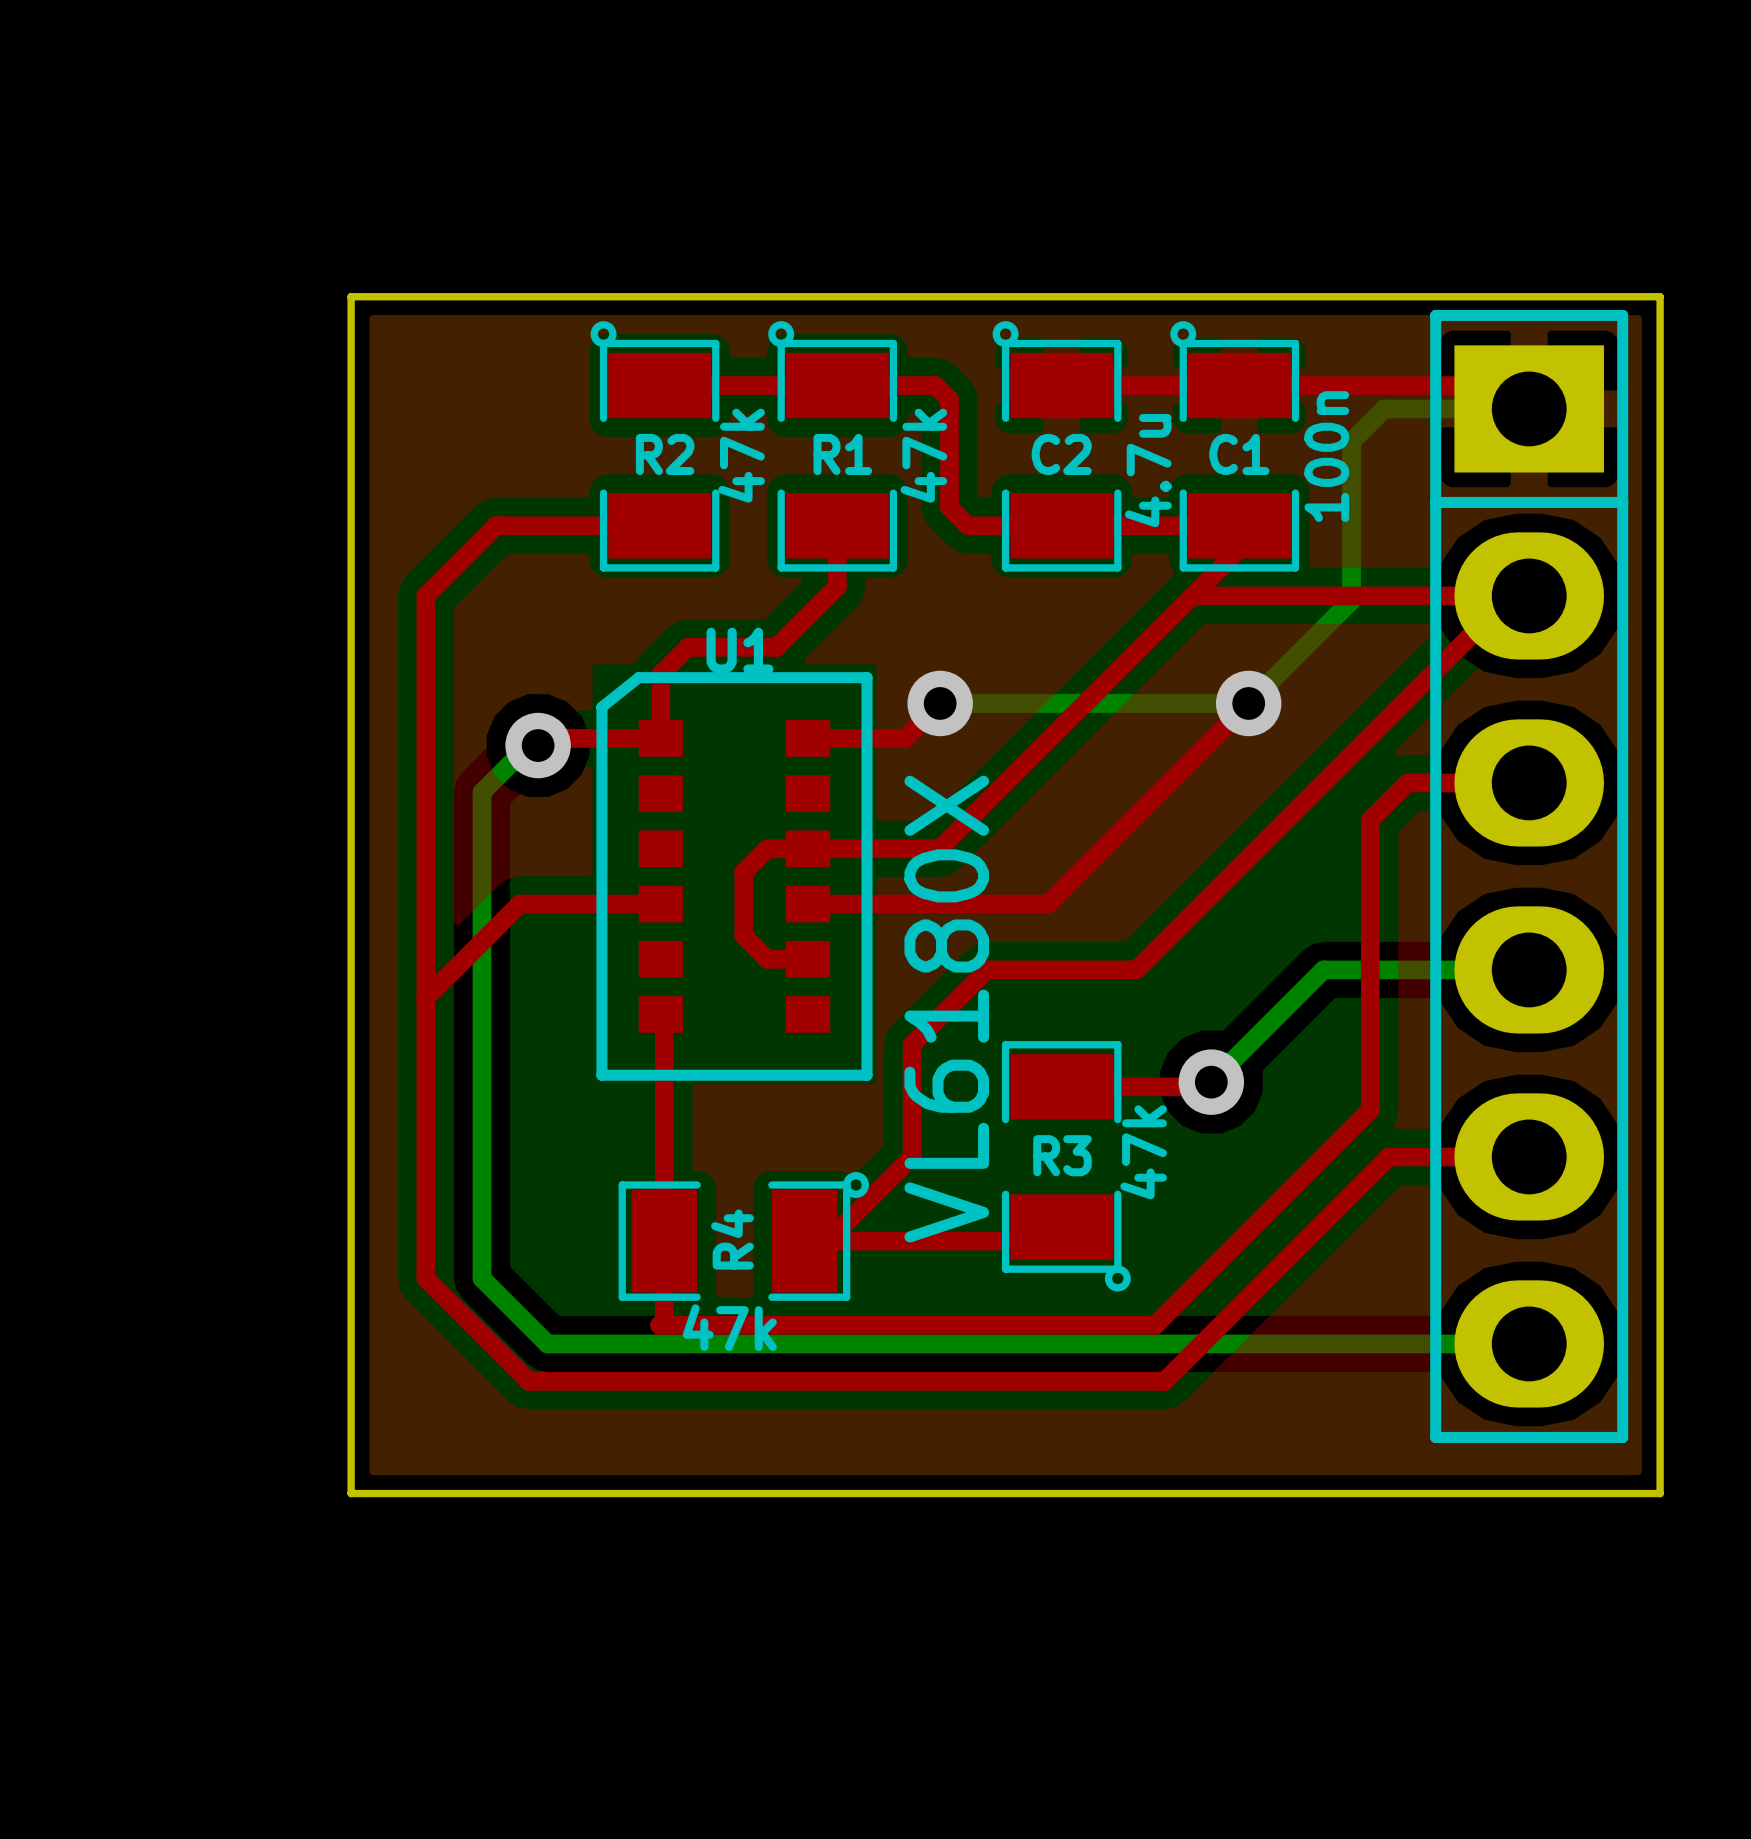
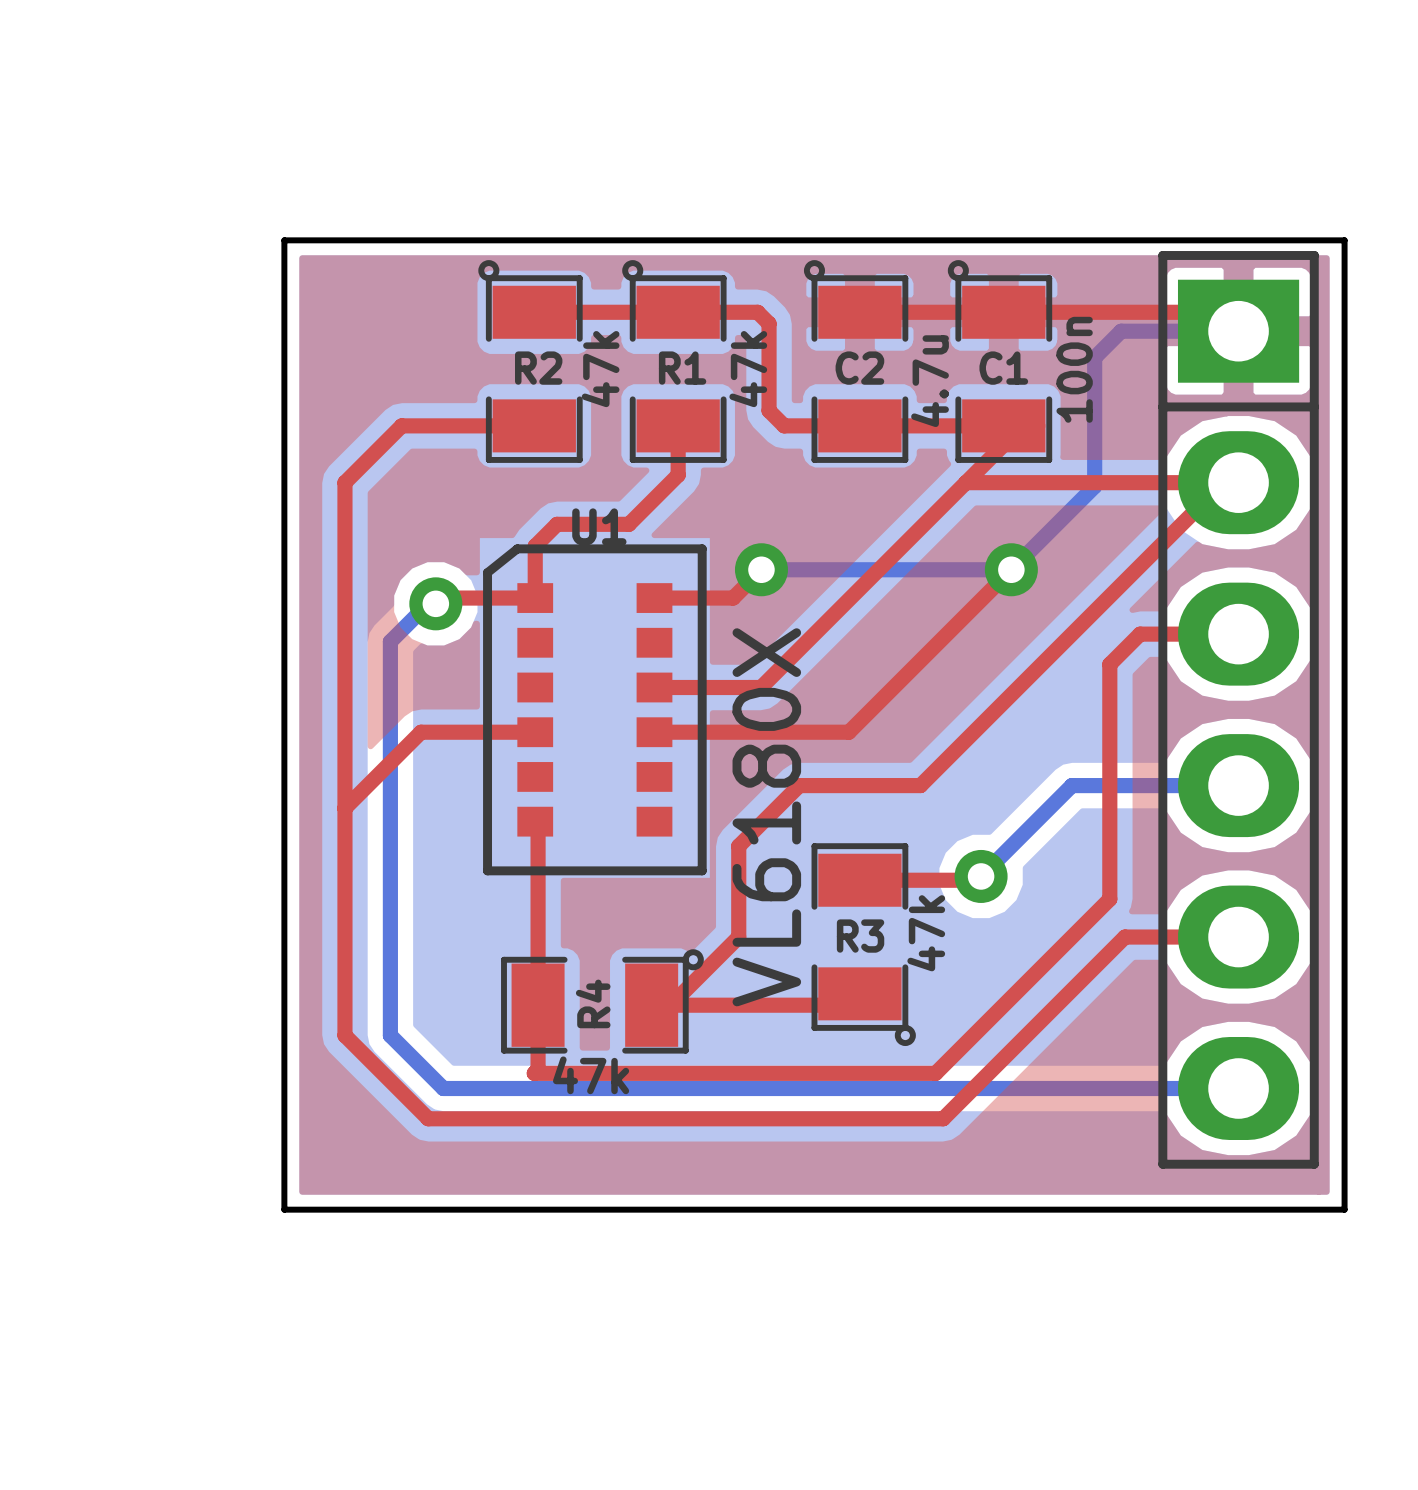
top track: (808, 848) (767, 848) (743, 872) (743, 935) (767, 959) (808, 959) -> none

